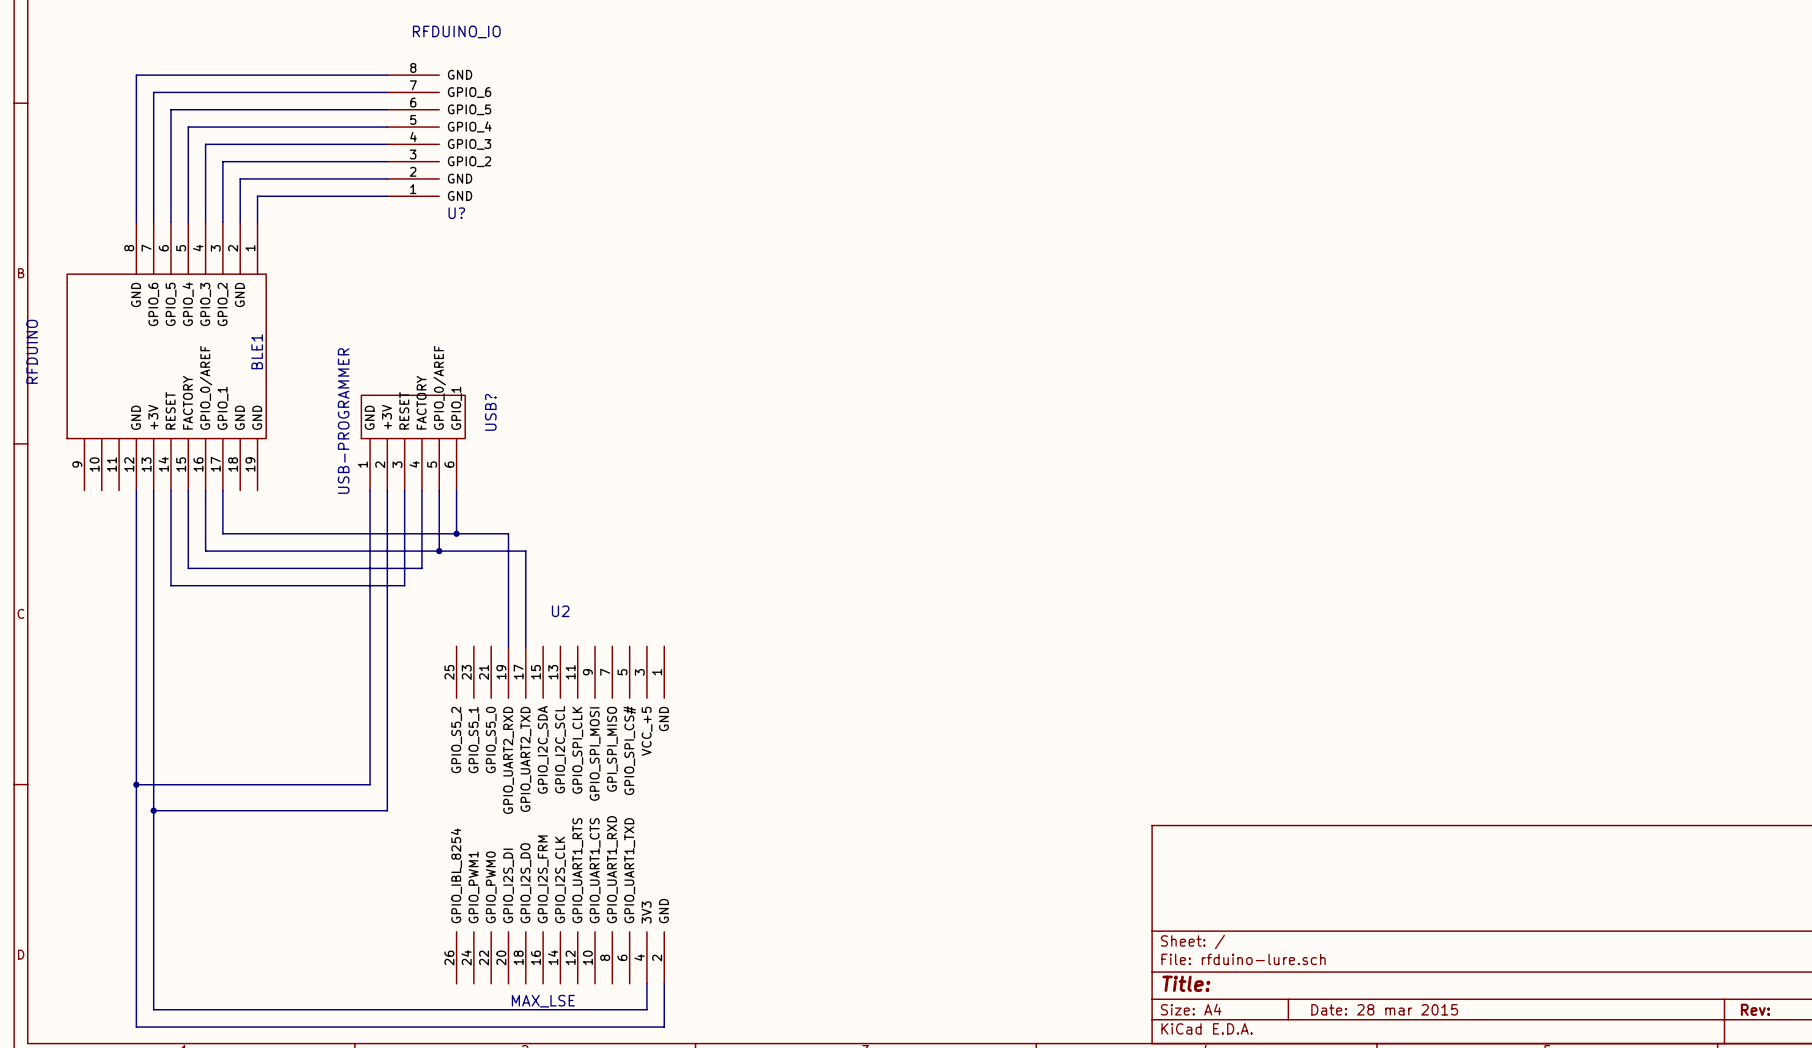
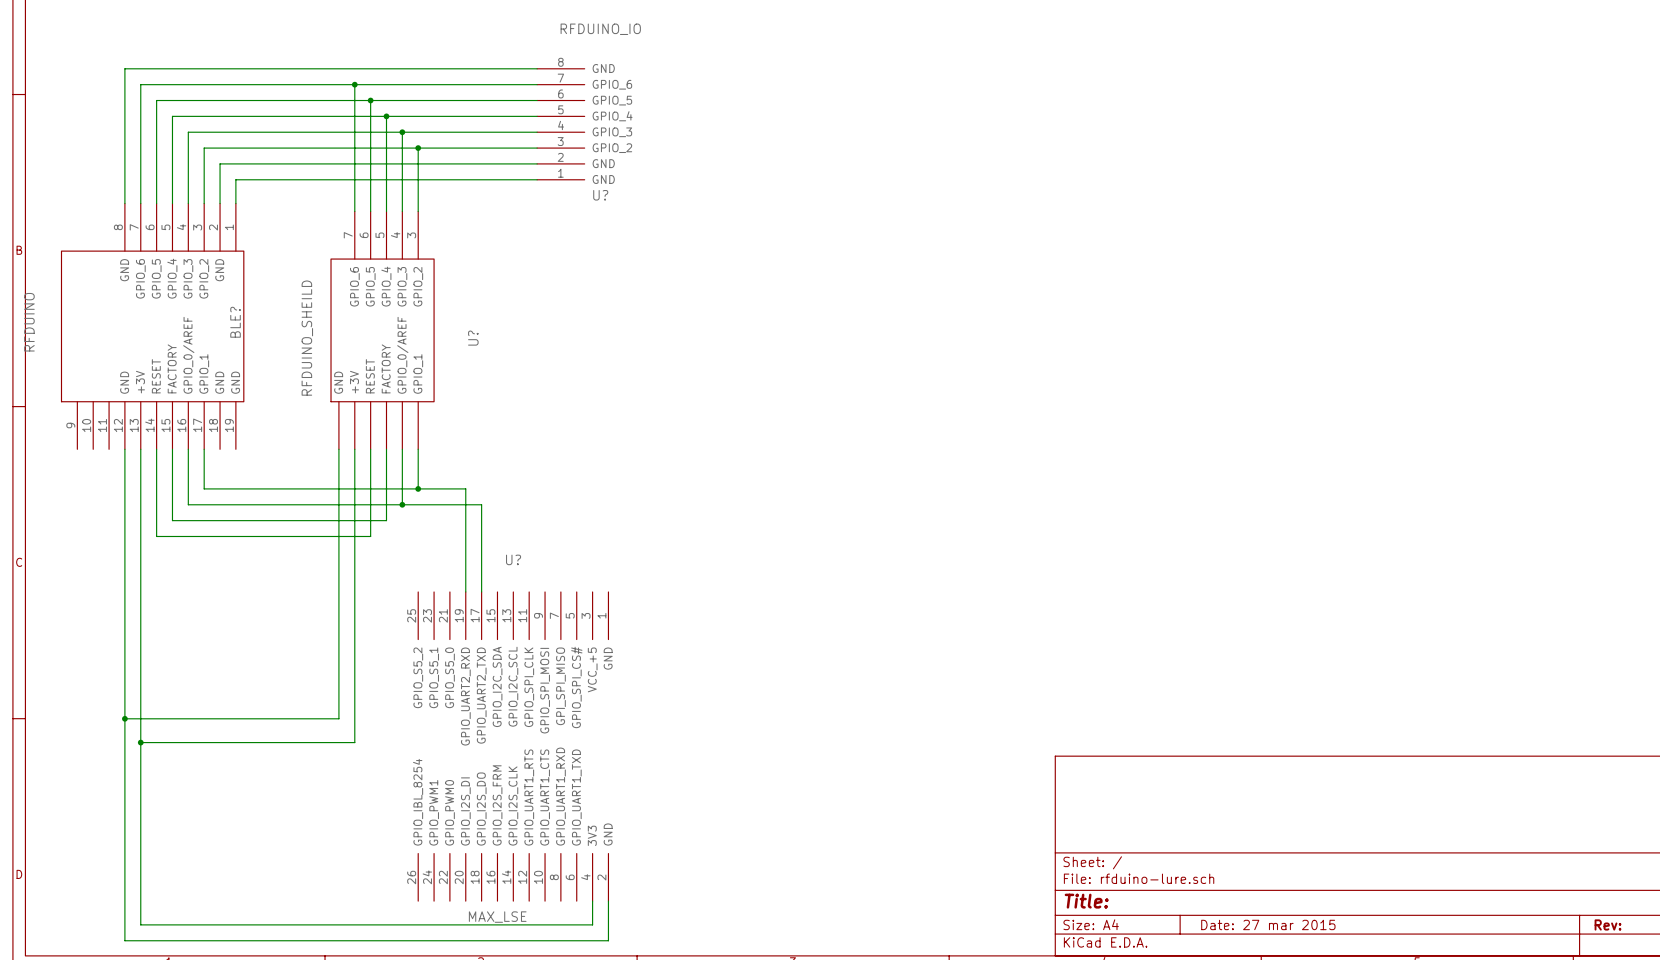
wire: none -> (354, 68) (537, 68)
junction: none -> (354, 84)
wire: none -> (537, 84) (354, 84) (354, 211)
wire: none -> (354, 100) (537, 100)
wire: none -> (370, 100) (370, 211)
junction: none -> (370, 100)
wire: none -> (354, 116) (537, 116)
wire: none -> (386, 116) (386, 211)
junction: none -> (386, 116)
U?: RFDUINO_IO (413, 135) -> none
U?: none -> RFDUINO_IO (560, 124)
wire: none -> (354, 132) (537, 132)
wire: none -> (402, 132) (402, 211)
junction: none -> (402, 132)
wire: none -> (354, 148) (537, 148)
wire: none -> (418, 148) (418, 211)
junction: none -> (418, 148)
wire: none -> (354, 163) (537, 163)
wire: none -> (354, 179) (537, 179)
BLE1 name: BLE1 (257, 351) -> BLE? (235, 322)
U?: none -> RFDUINO_SHEILD (382, 330)
USB?: USB-PROGRAMMER (413, 442) -> none
U2 name: U2 (560, 611) -> U? (513, 559)
title block: Date: 28 mar 2015 (1384, 1009) -> Date: 27 mar 2015 (1268, 924)

